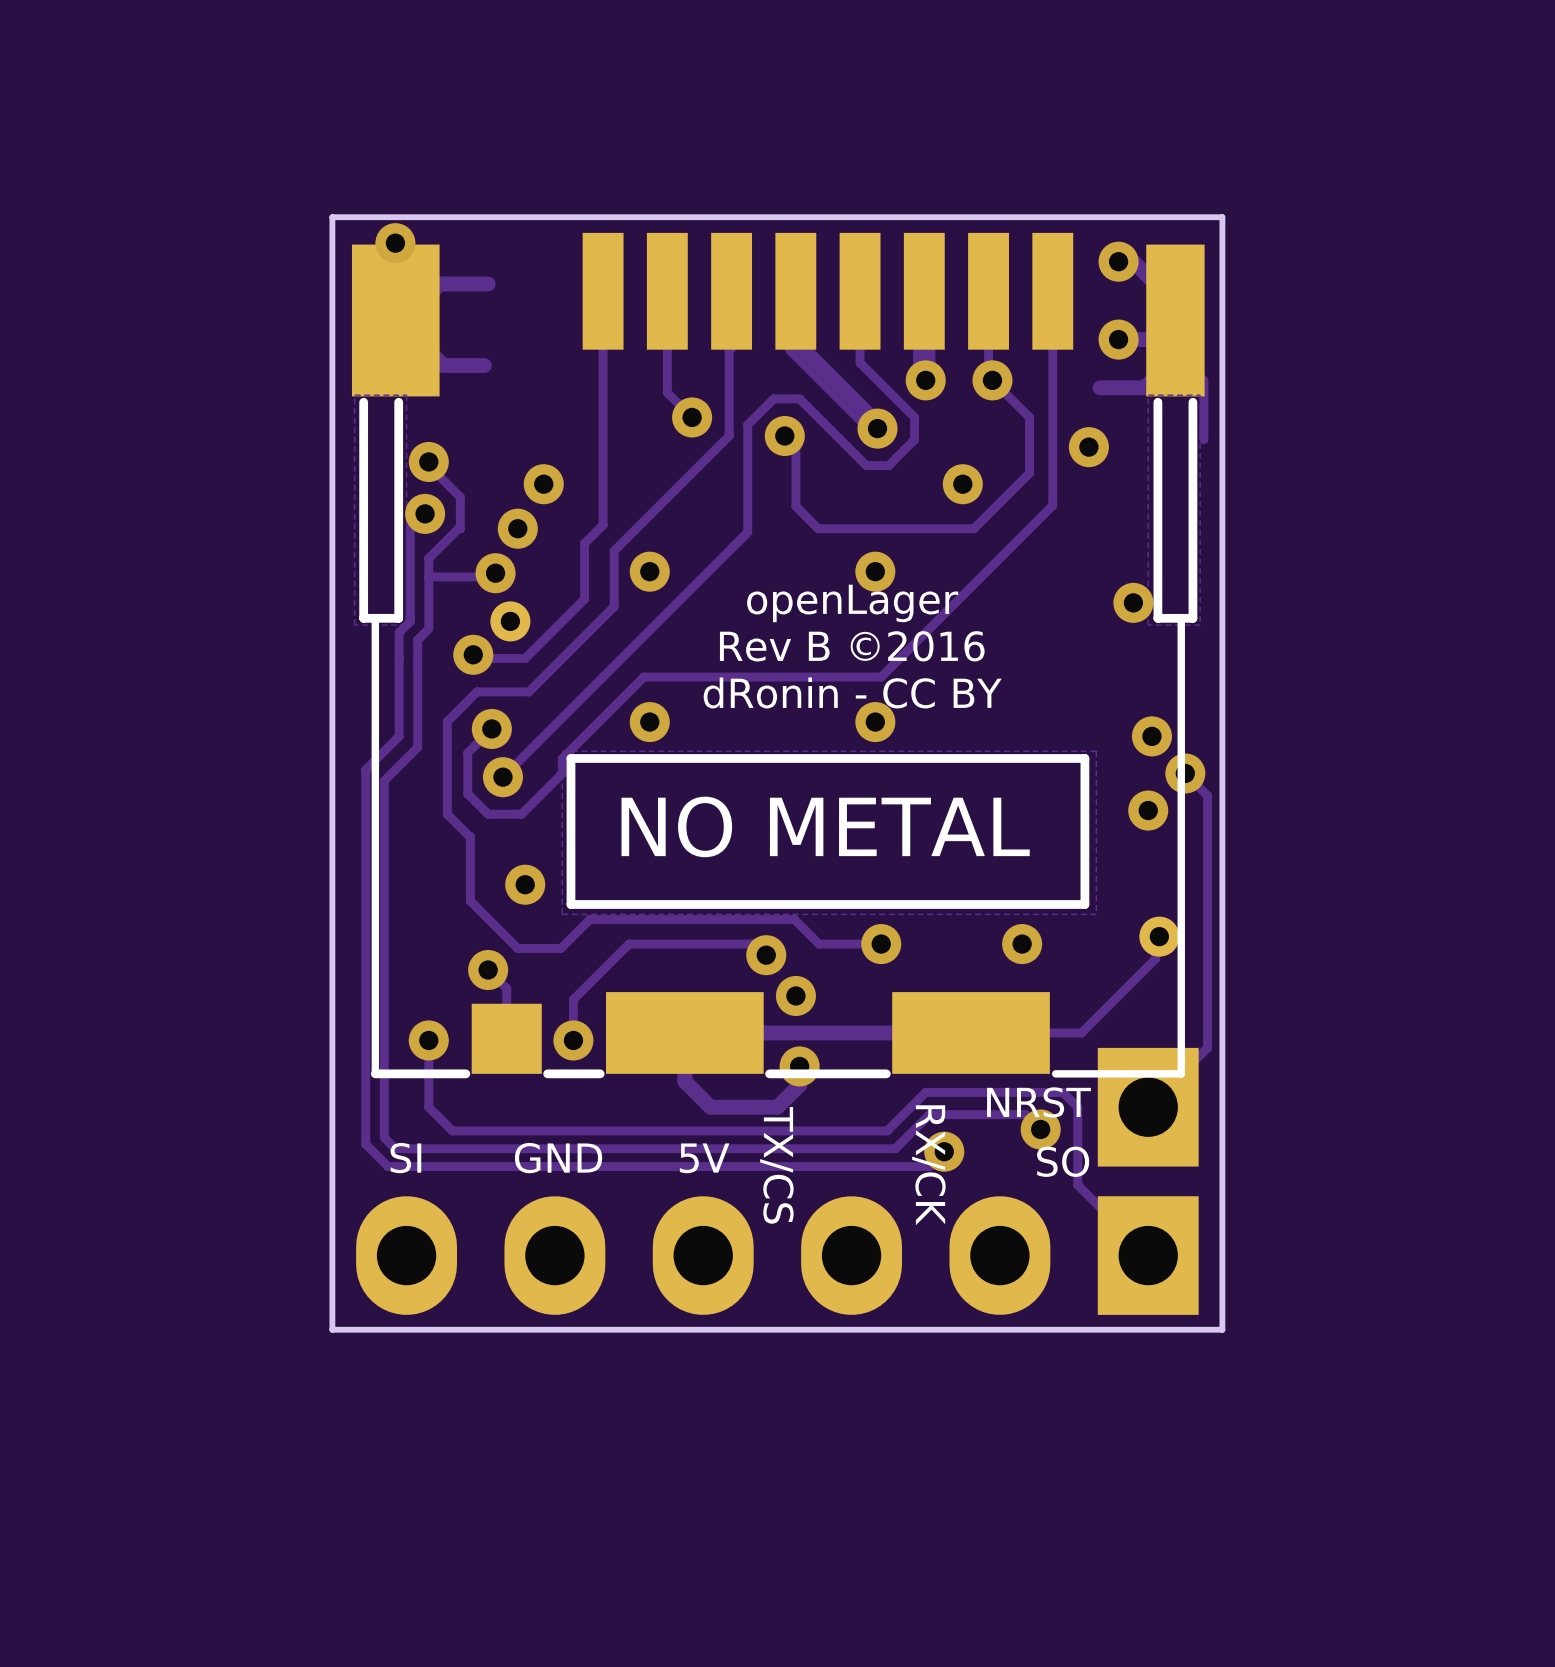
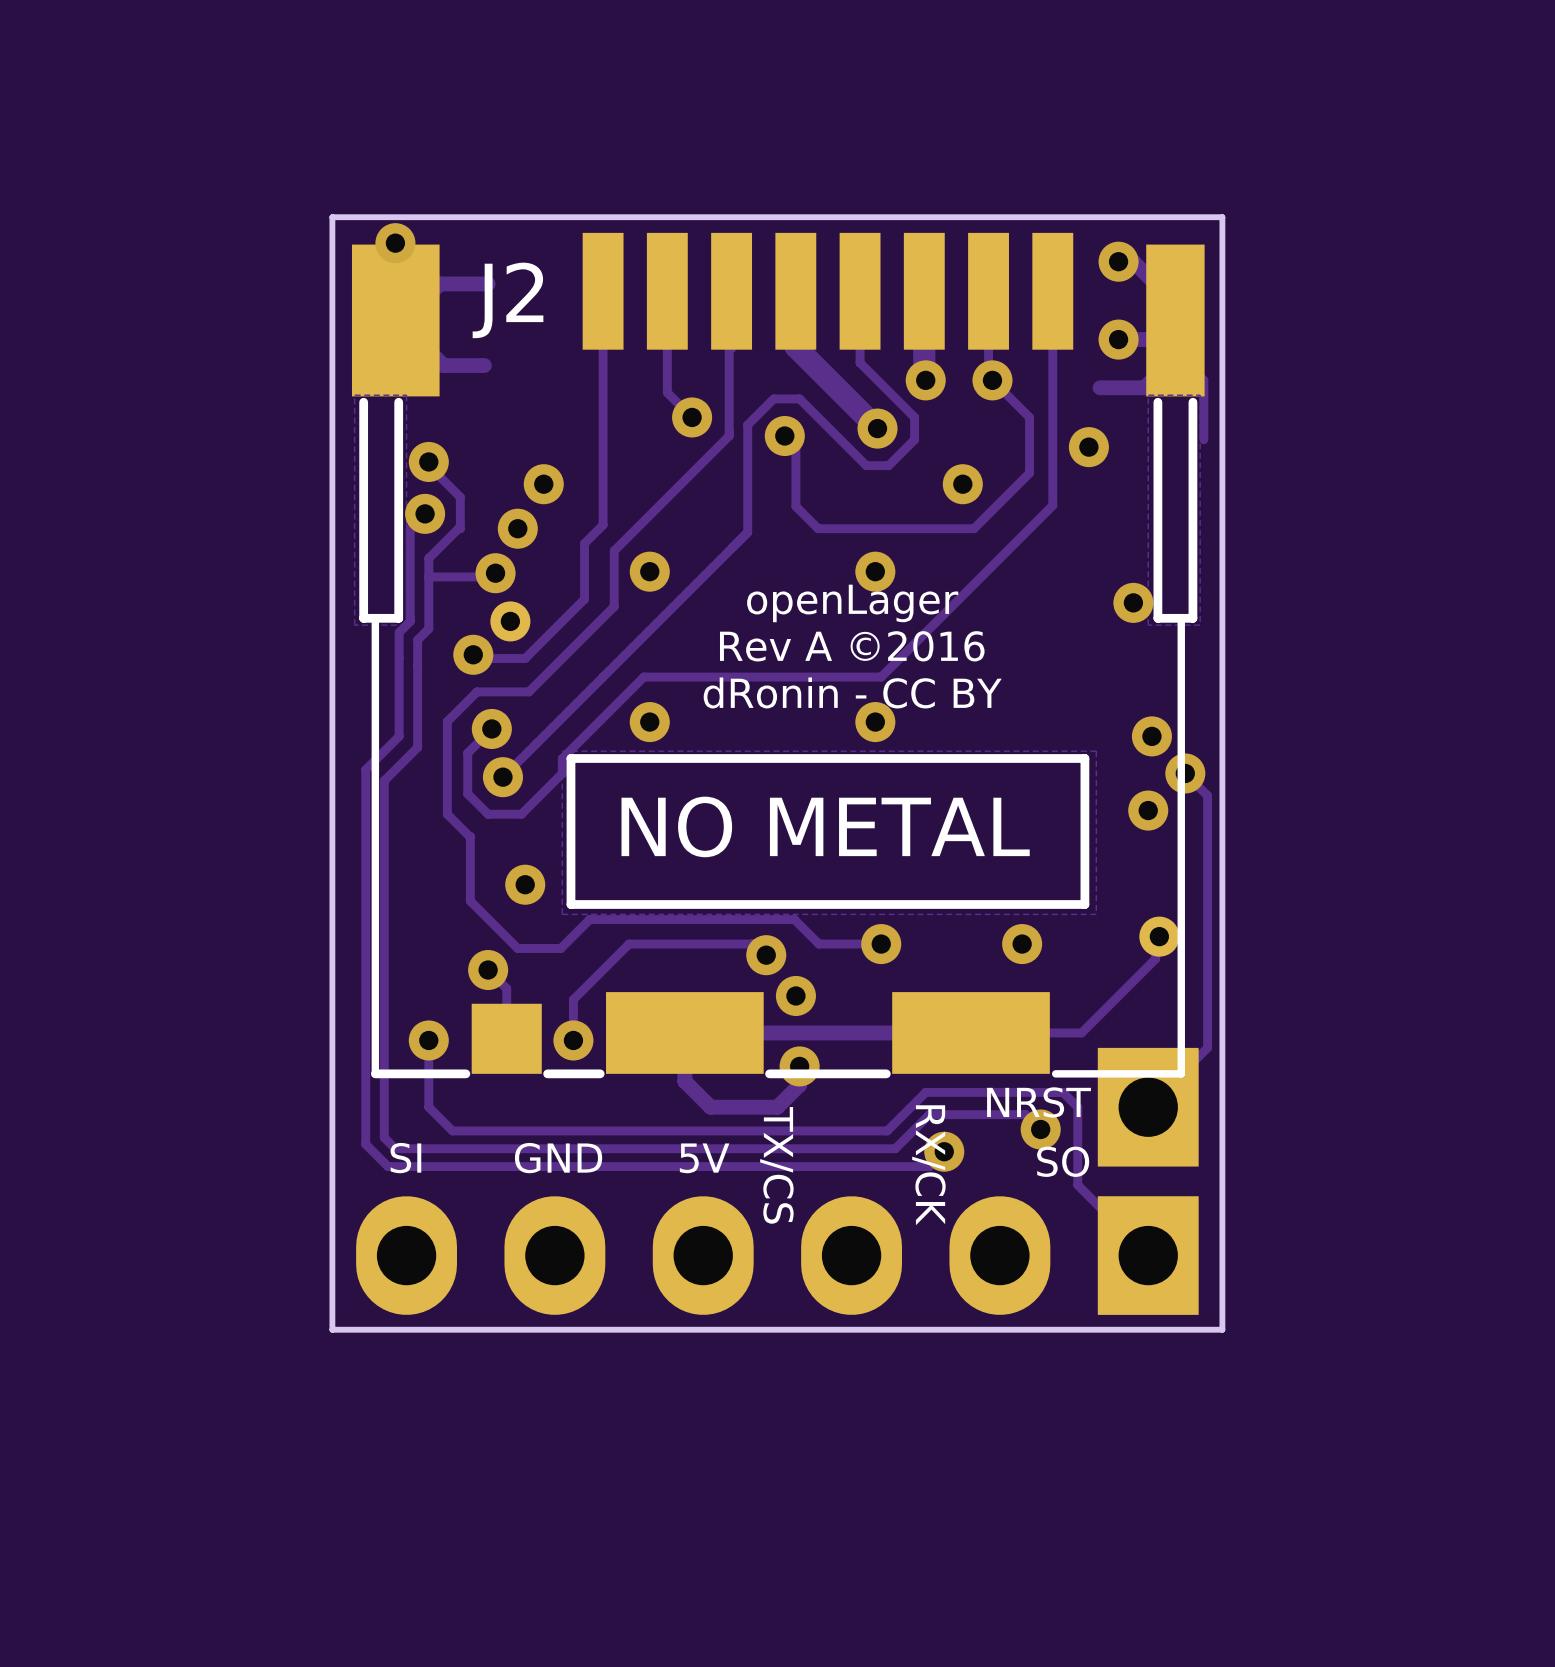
J2 name: none -> J2 (508, 300)
text: Rev B ©2016 (852, 646) -> Rev A ©2016 (852, 646)

